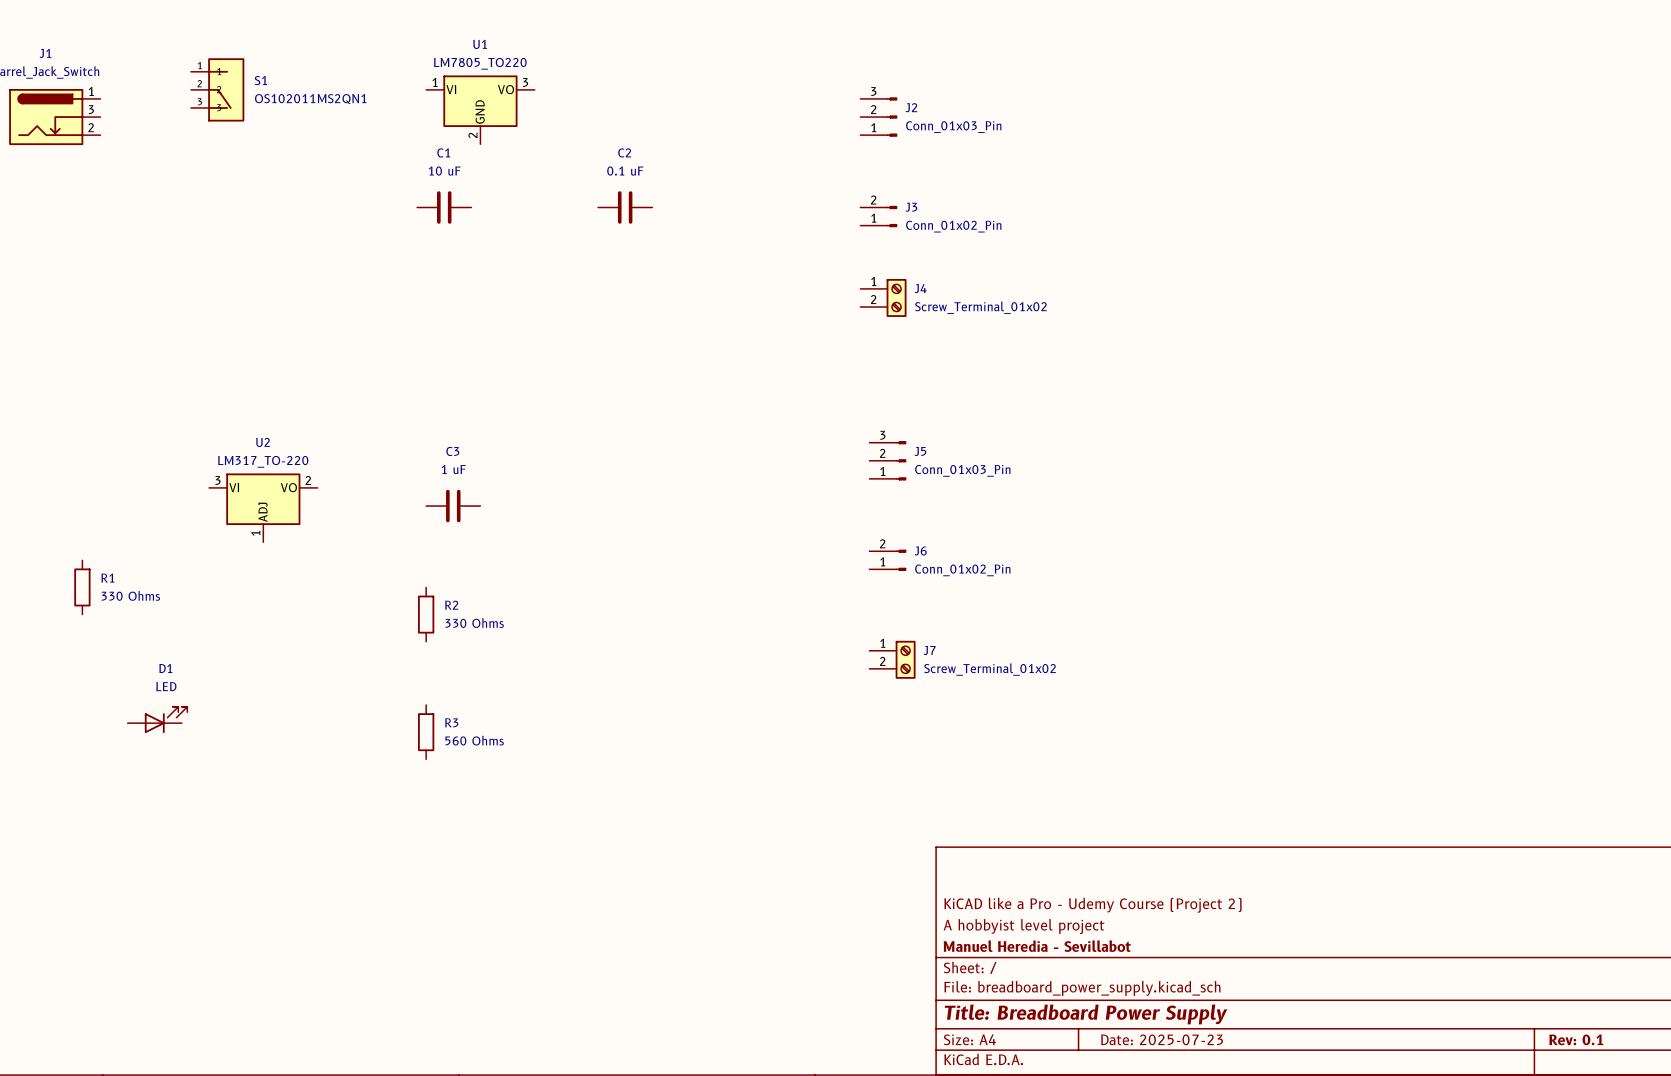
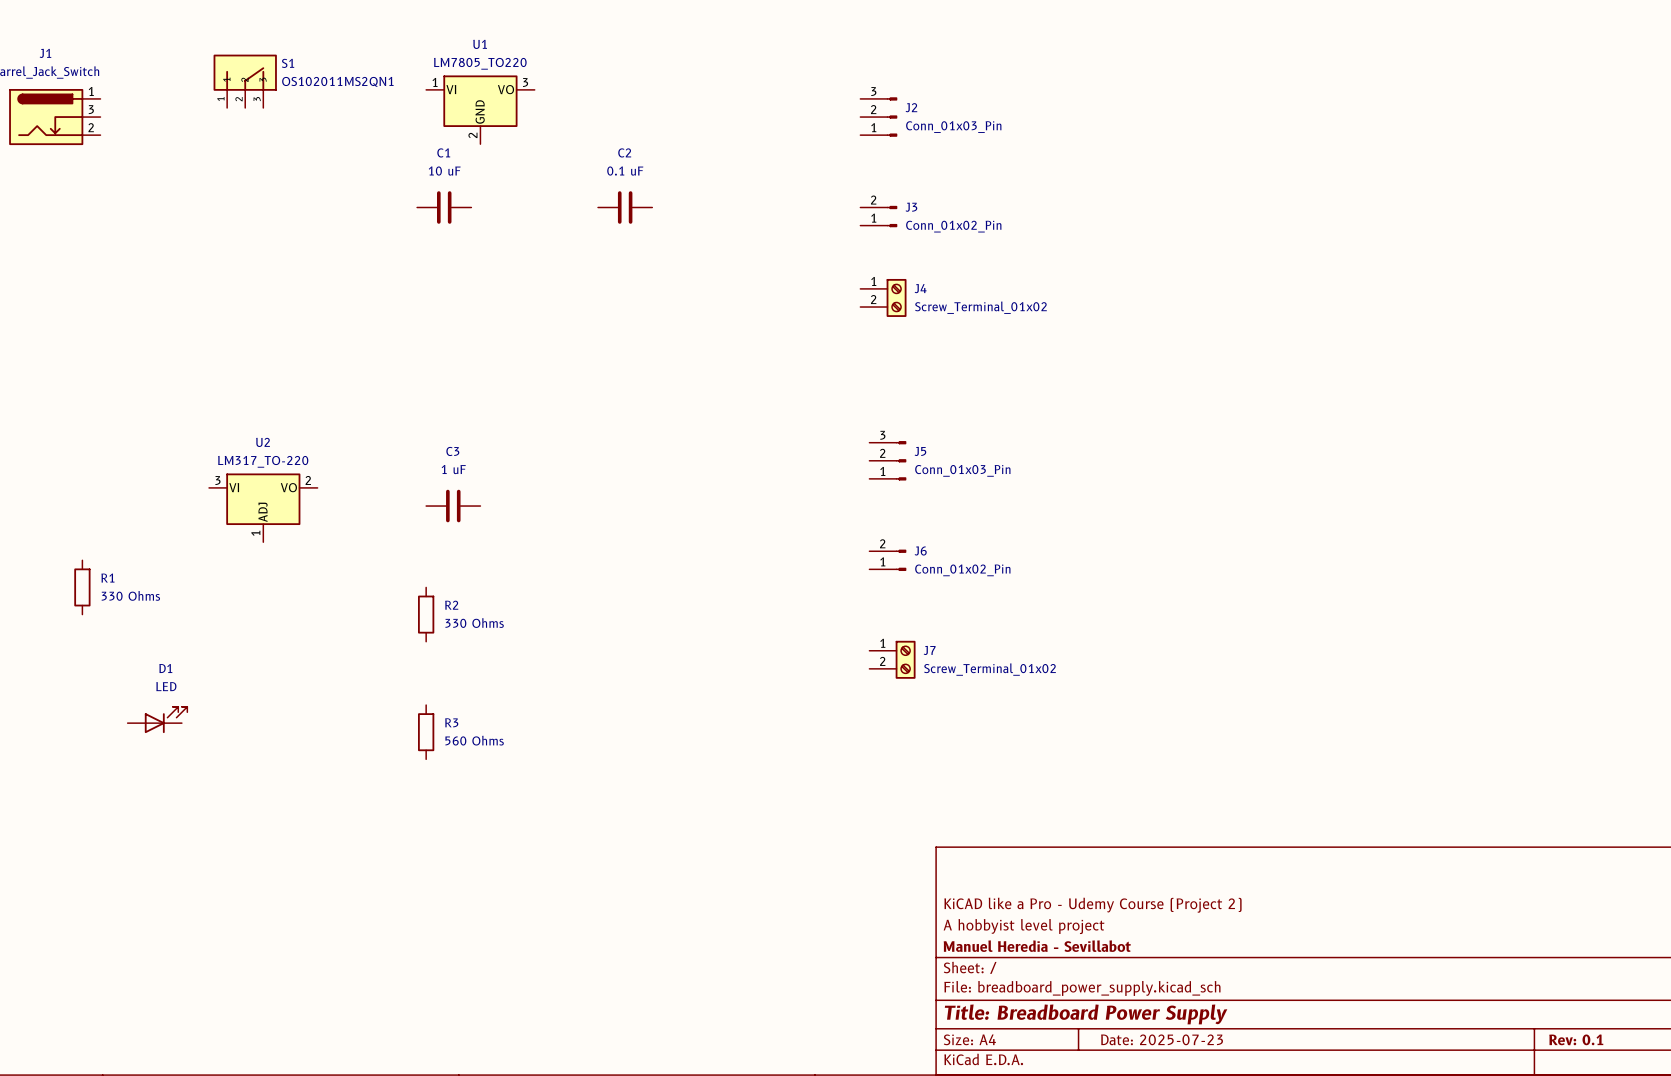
S1 rotation: 0° (226, 89) -> 90° counterclockwise (245, 72)

